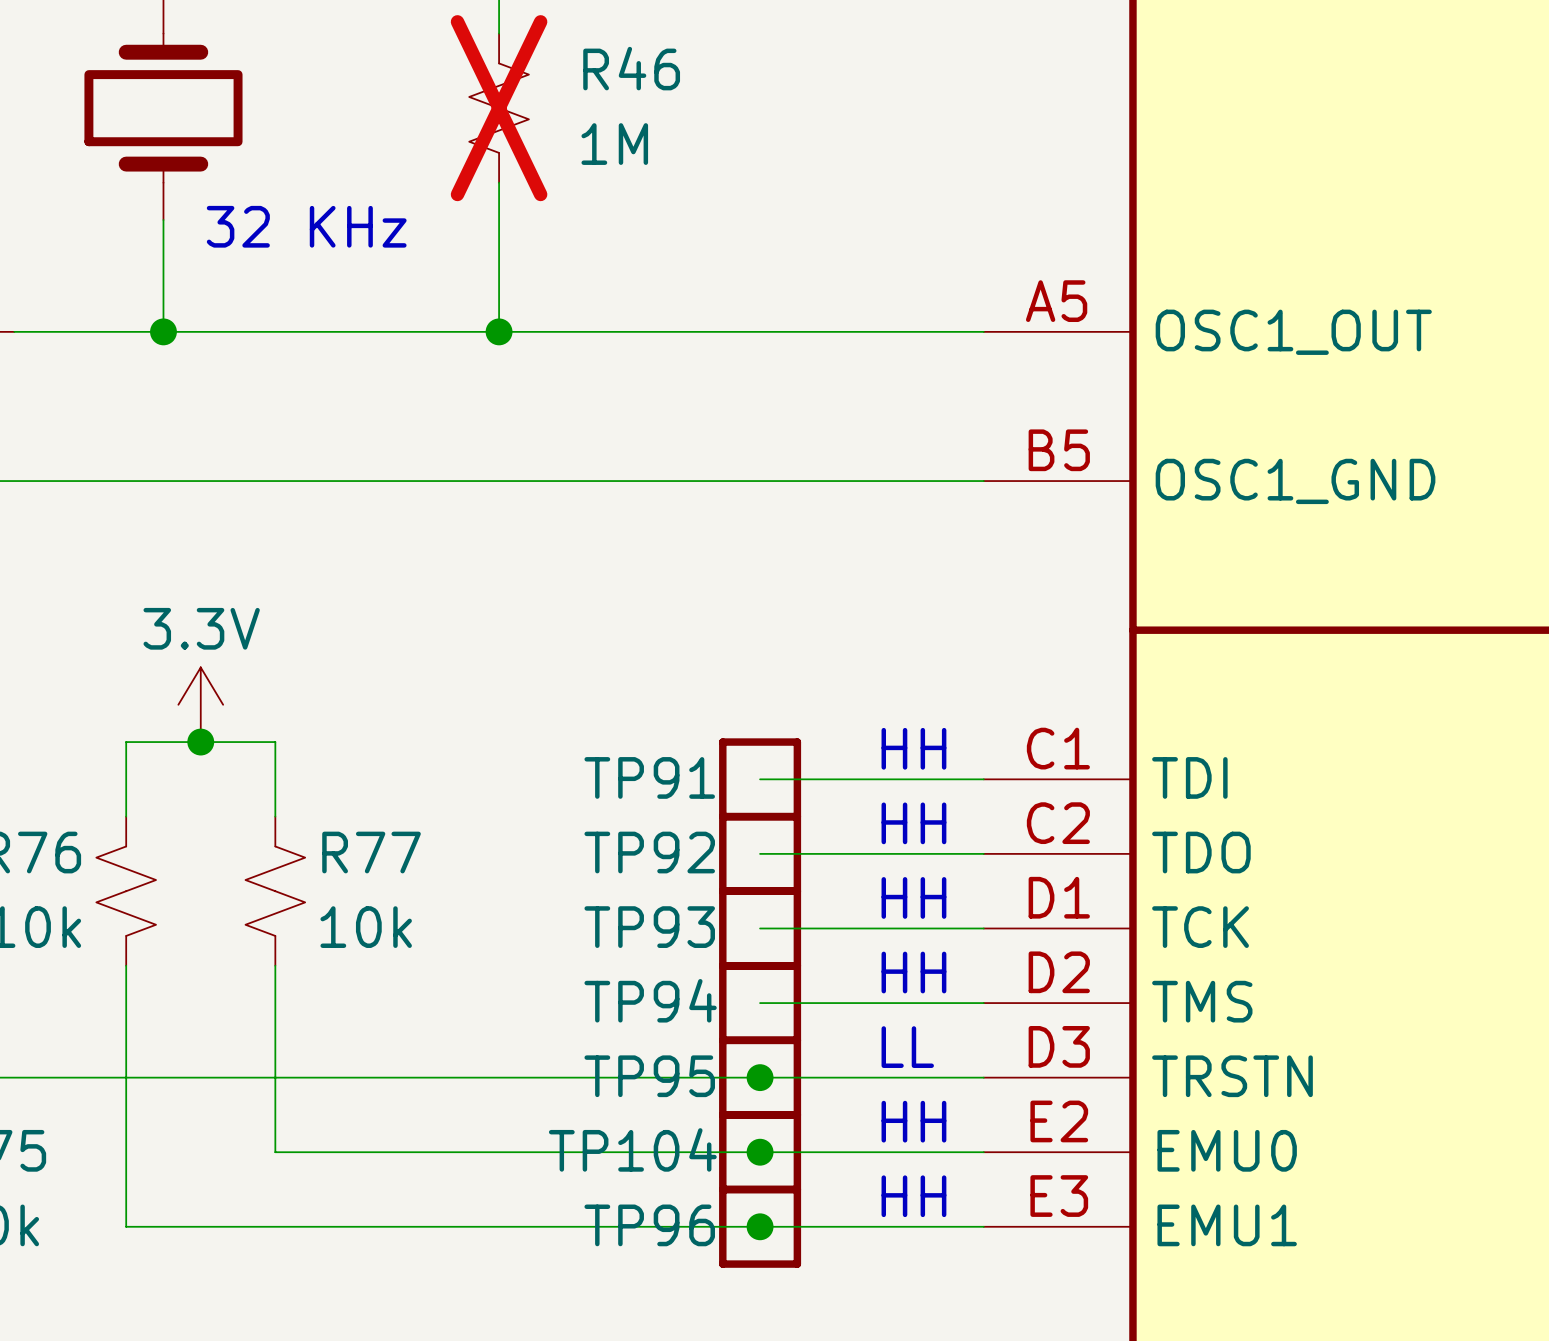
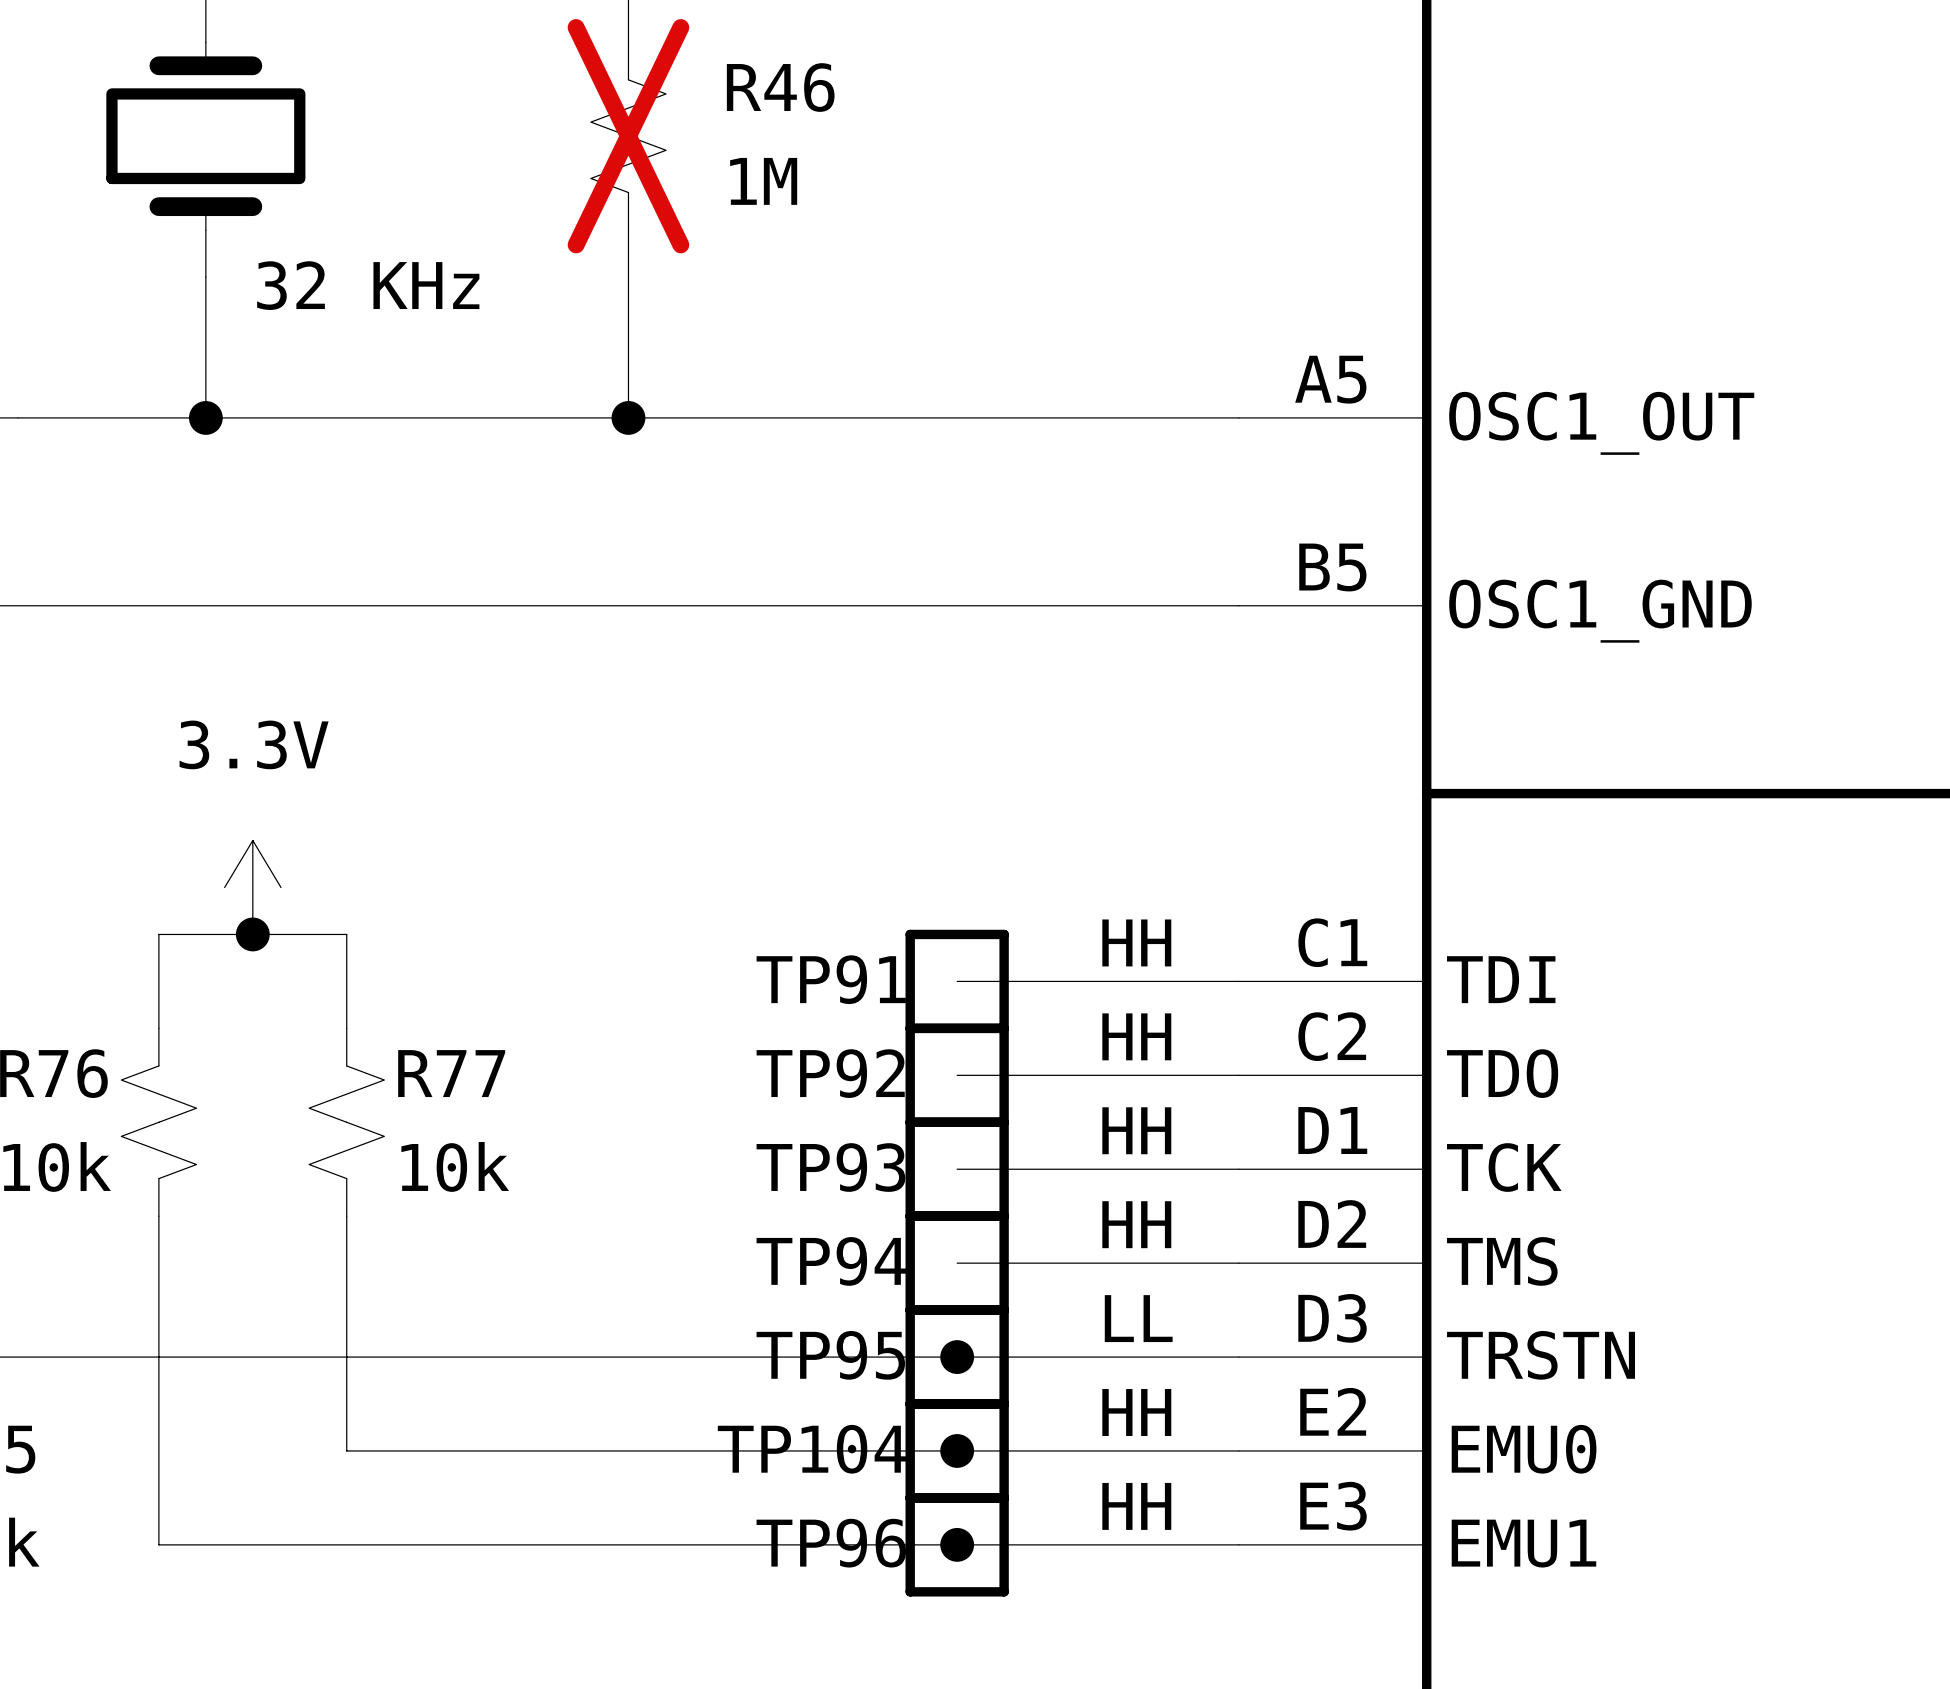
power symbol text position: 3.3V (201, 628) -> 3.3V (254, 744)

